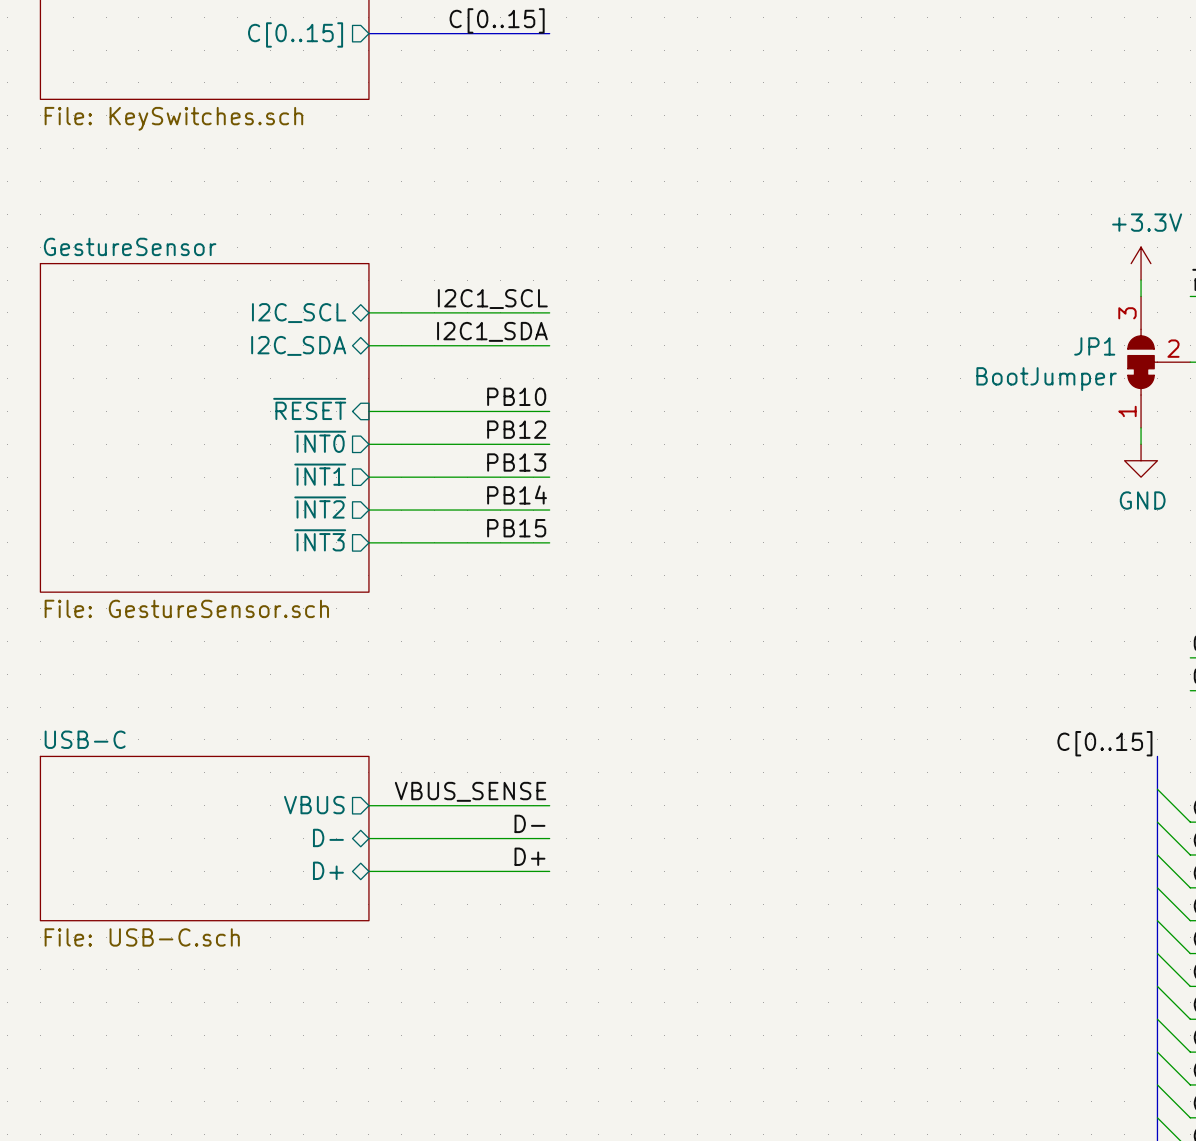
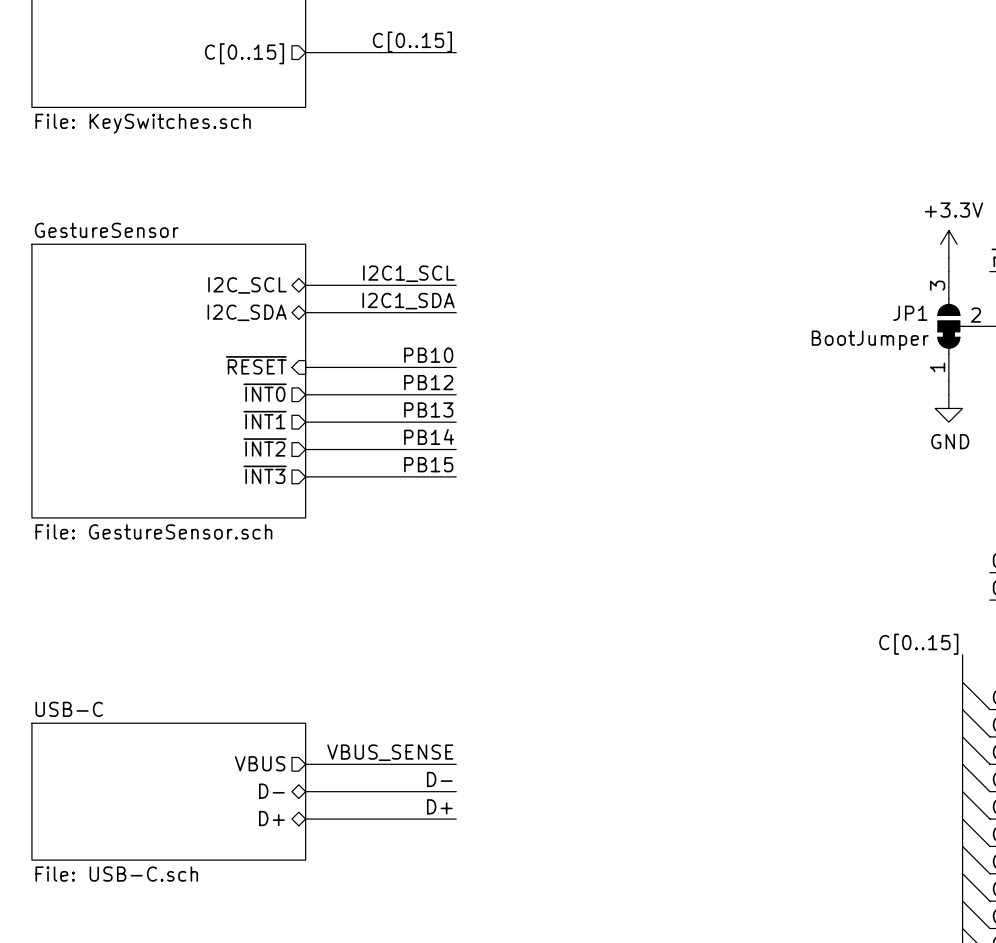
label position: VBUS_SENSE (470, 791) -> VBUS_SENSE (390, 752)
sheet pin position: VBUS (314, 805) -> VBUS (260, 763)
wire: (368, 805) (549, 805) -> (305, 764) (456, 764)
label position: D- (529, 823) -> D- (439, 779)
sheet pin position: D- (328, 837) -> D- (271, 791)
sheet USB-C position: (204, 838) -> (168, 791)
wire: (368, 838) (549, 838) -> (305, 791) (456, 791)
label position: D+ (529, 856) -> D+ (439, 806)
sheet pin position: D+ (328, 870) -> D+ (271, 818)
wire: (368, 871) (549, 871) -> (305, 819) (456, 819)

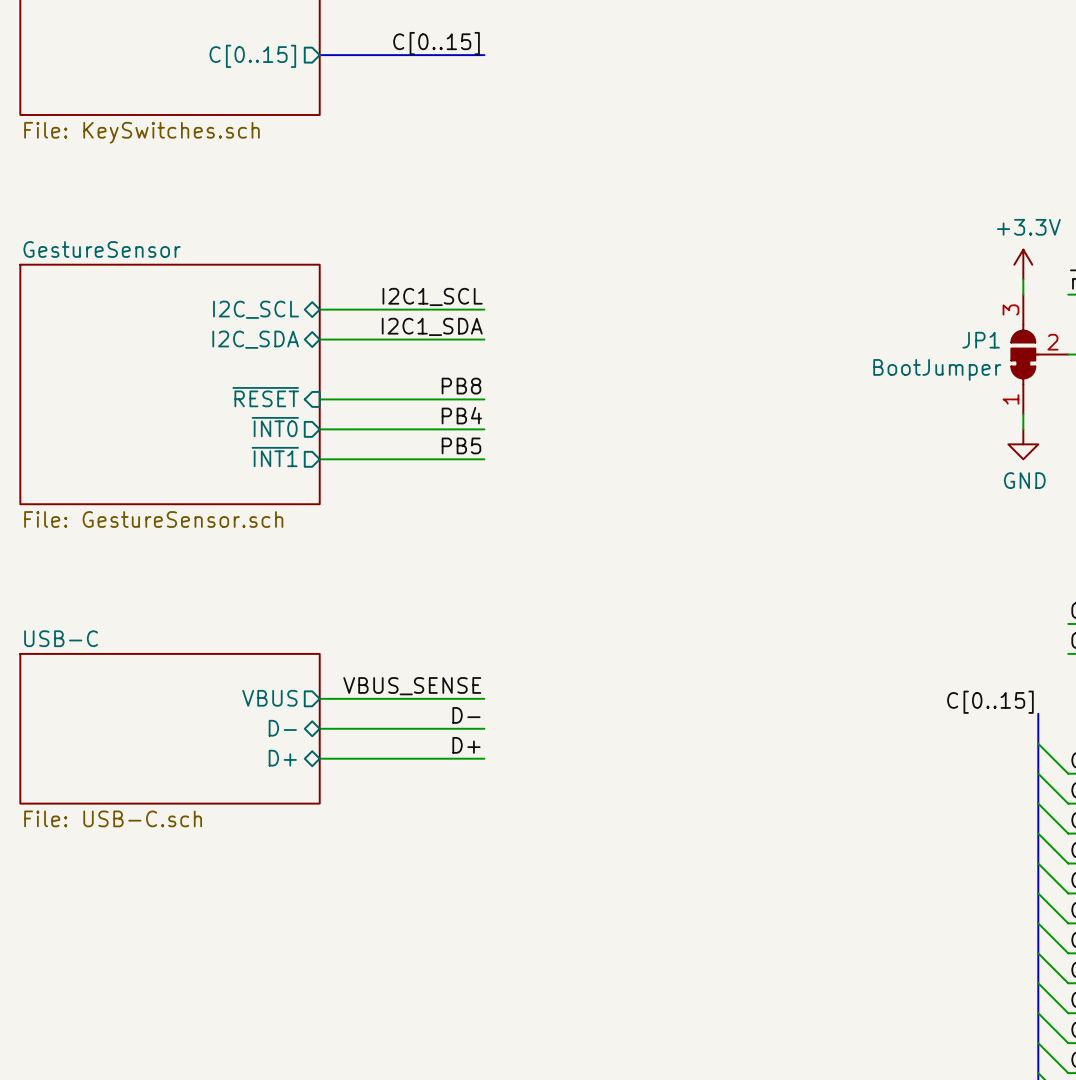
sheet GestureSensor: none -> File: GestureSensor.sch (170, 384)
label: PB10 (428, 355) -> PB8 (461, 386)
sheet GestureSensor: File: GestureSensor.sch (168, 381) -> none
label: PB12 (428, 382) -> PB4 (461, 415)
label: PB13 (428, 409) -> PB5 (461, 445)
label: PB14 (429, 436) -> none
sheet pin: ~{INT2} (265, 447) -> none
wire: (305, 449) (456, 449) -> none
label: PB15 (428, 464) -> none
sheet pin: ~{INT3} (265, 474) -> none
wire: (305, 476) (456, 476) -> none
label position: VBUS_SENSE (390, 752) -> VBUS_SENSE (412, 686)
sheet pin position: VBUS (260, 763) -> VBUS (269, 698)
wire: (305, 764) (456, 764) -> (319, 698) (484, 698)
label position: D- (439, 779) -> D- (466, 715)
sheet USB-C position: (168, 791) -> (170, 728)
sheet pin position: D- (271, 791) -> D- (282, 728)
wire: (305, 791) (456, 791) -> (319, 728) (484, 728)
label position: D+ (439, 806) -> D+ (466, 745)
sheet pin position: D+ (271, 818) -> D+ (282, 758)
wire: (305, 819) (456, 819) -> (319, 758) (484, 758)

